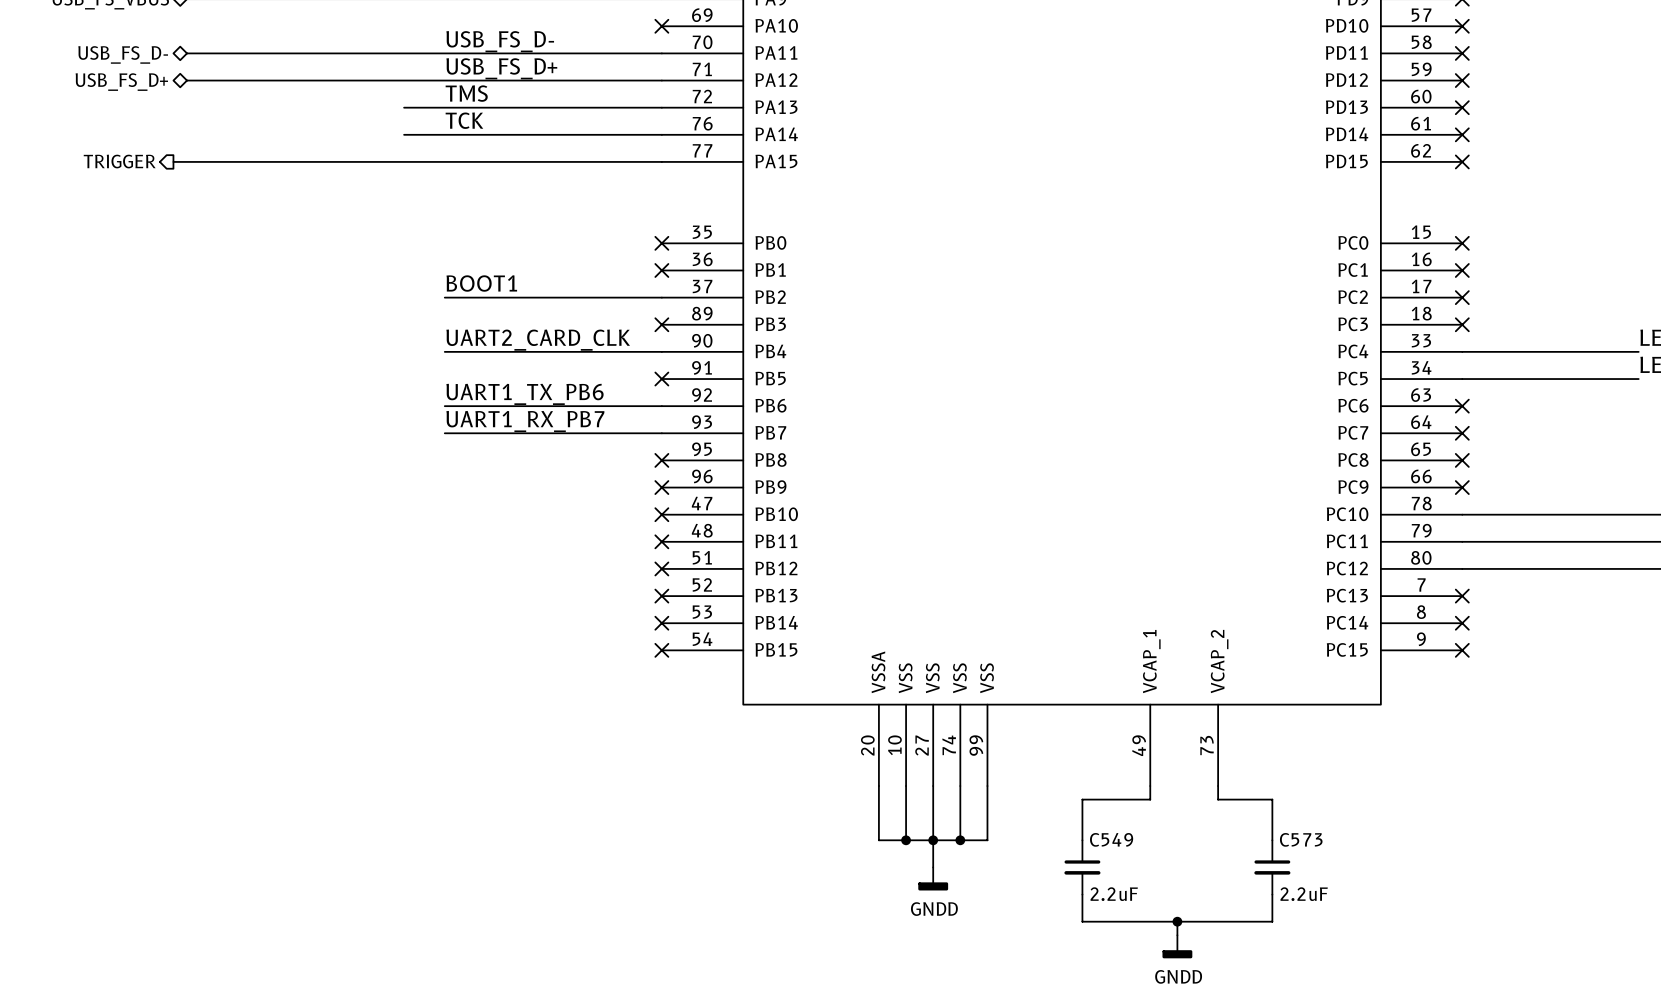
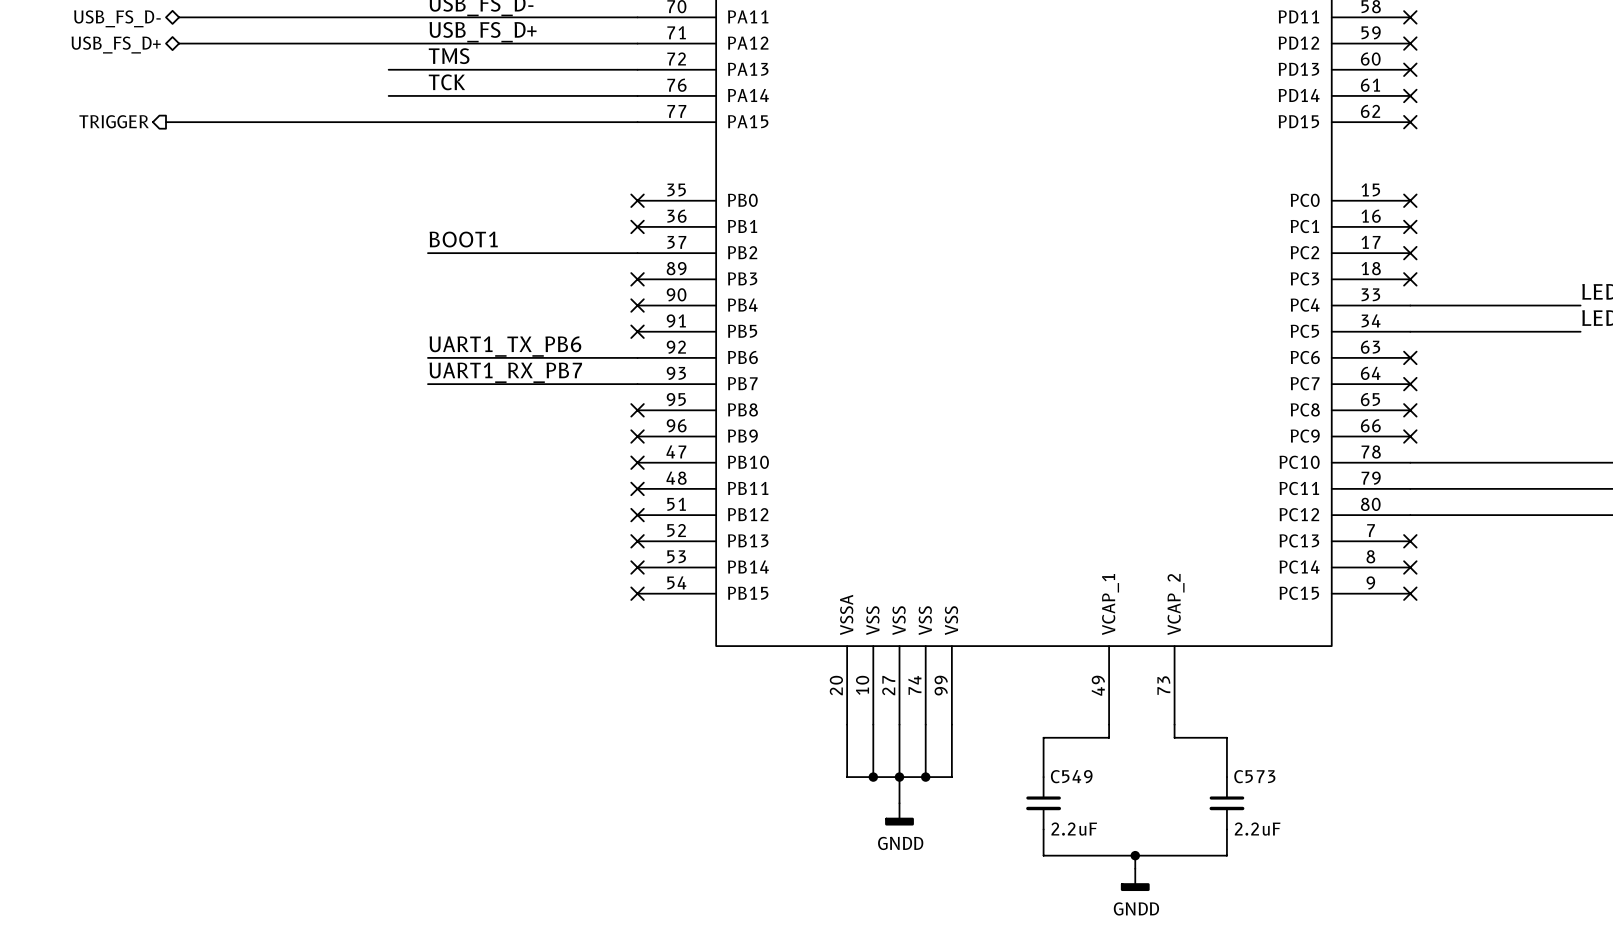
label: UART2_CARD_CLK (538, 340) -> none
wire: (444, 351) (661, 351) -> none
no-connect mark: none -> (637, 305)

